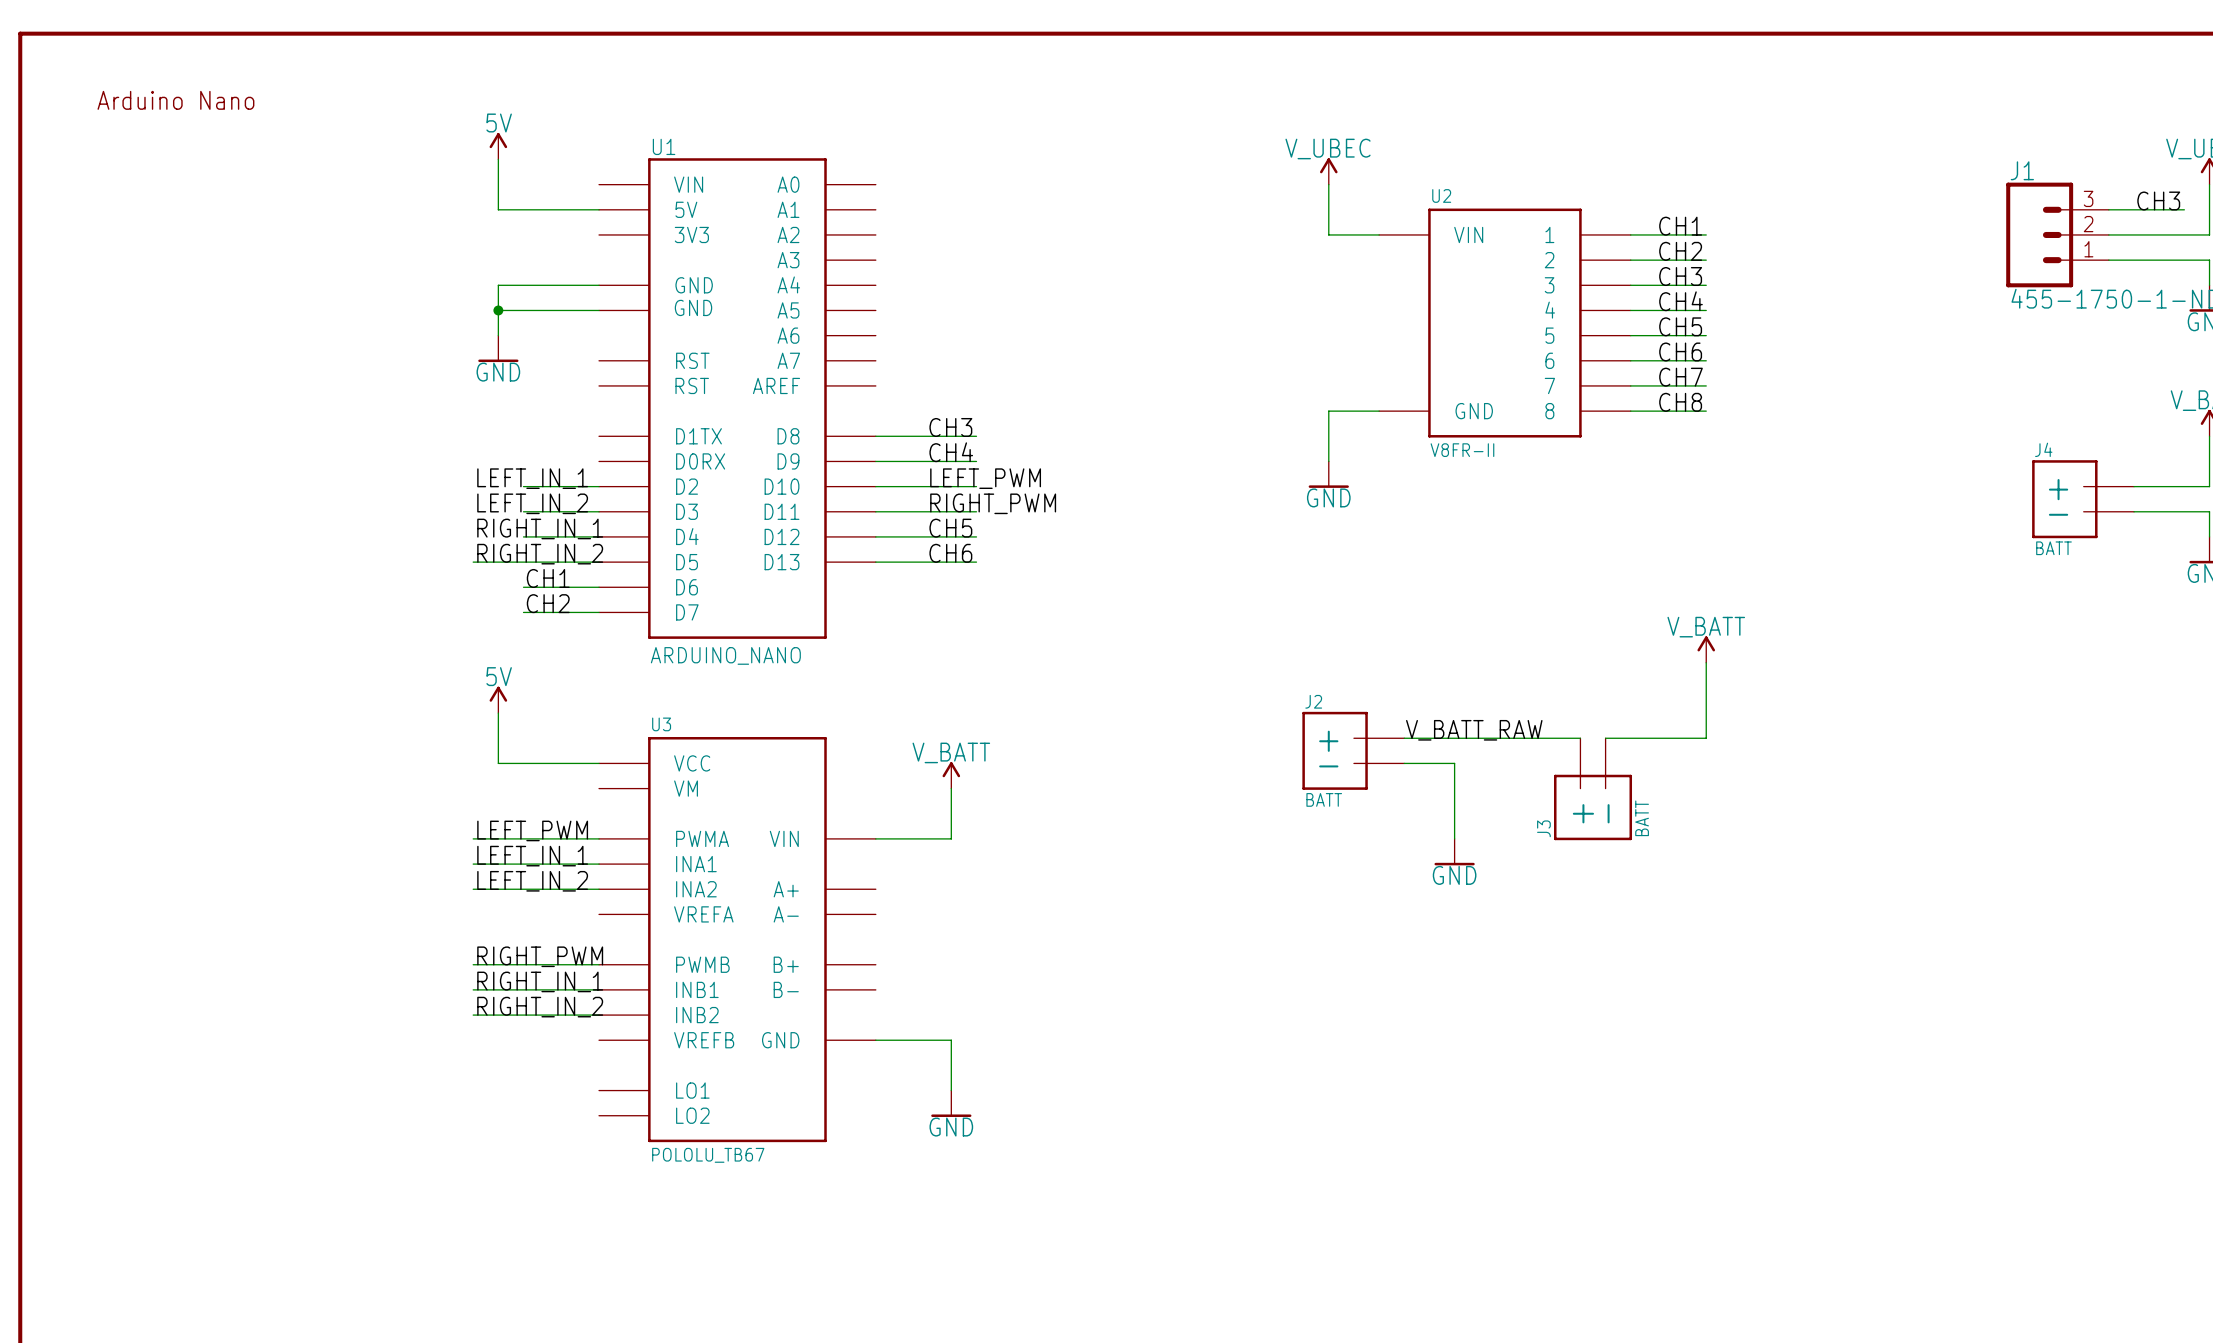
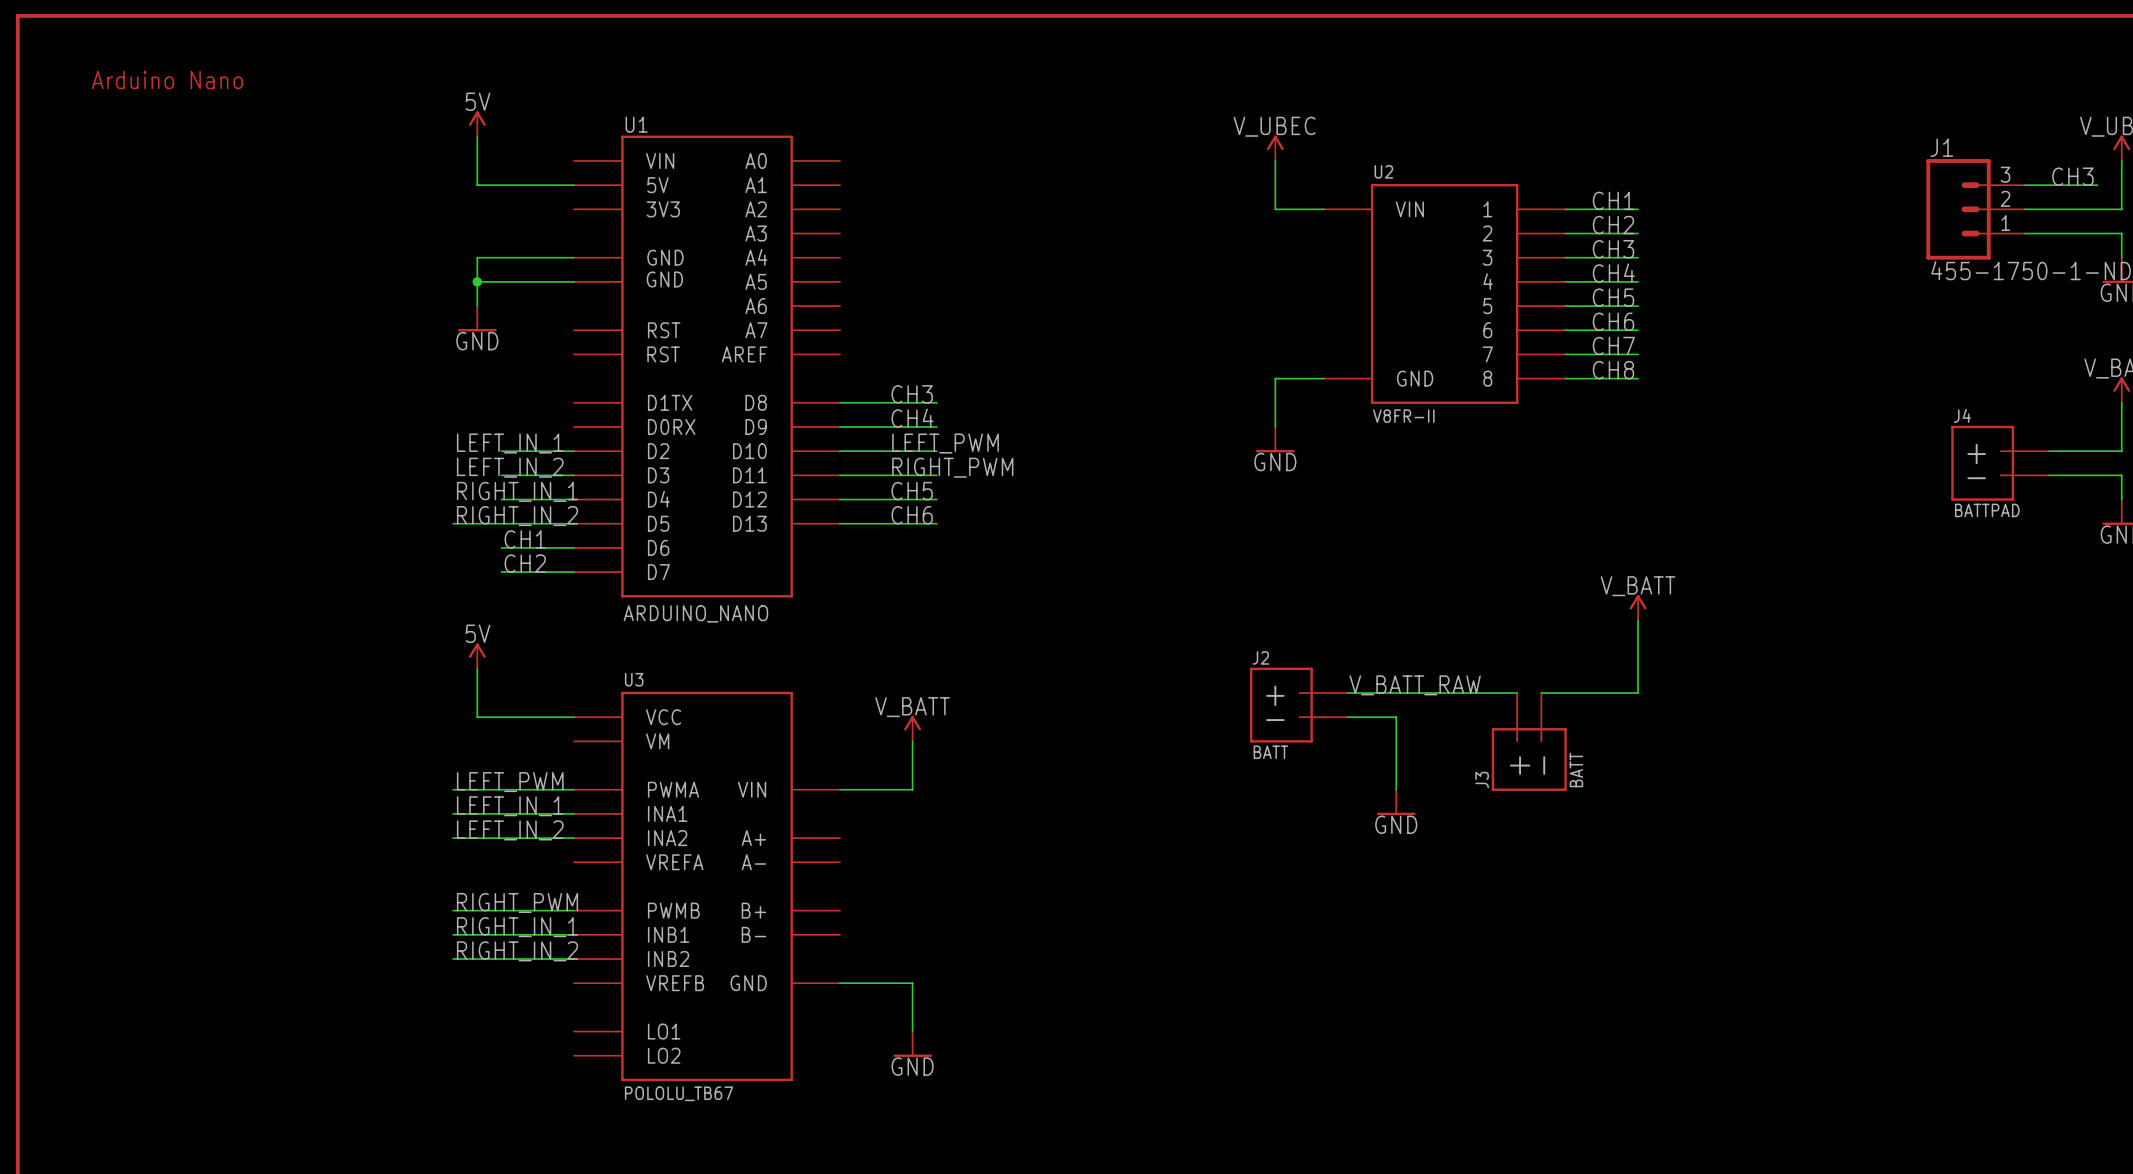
J4 value: BATT (2053, 548) -> BATTPAD (1987, 510)

